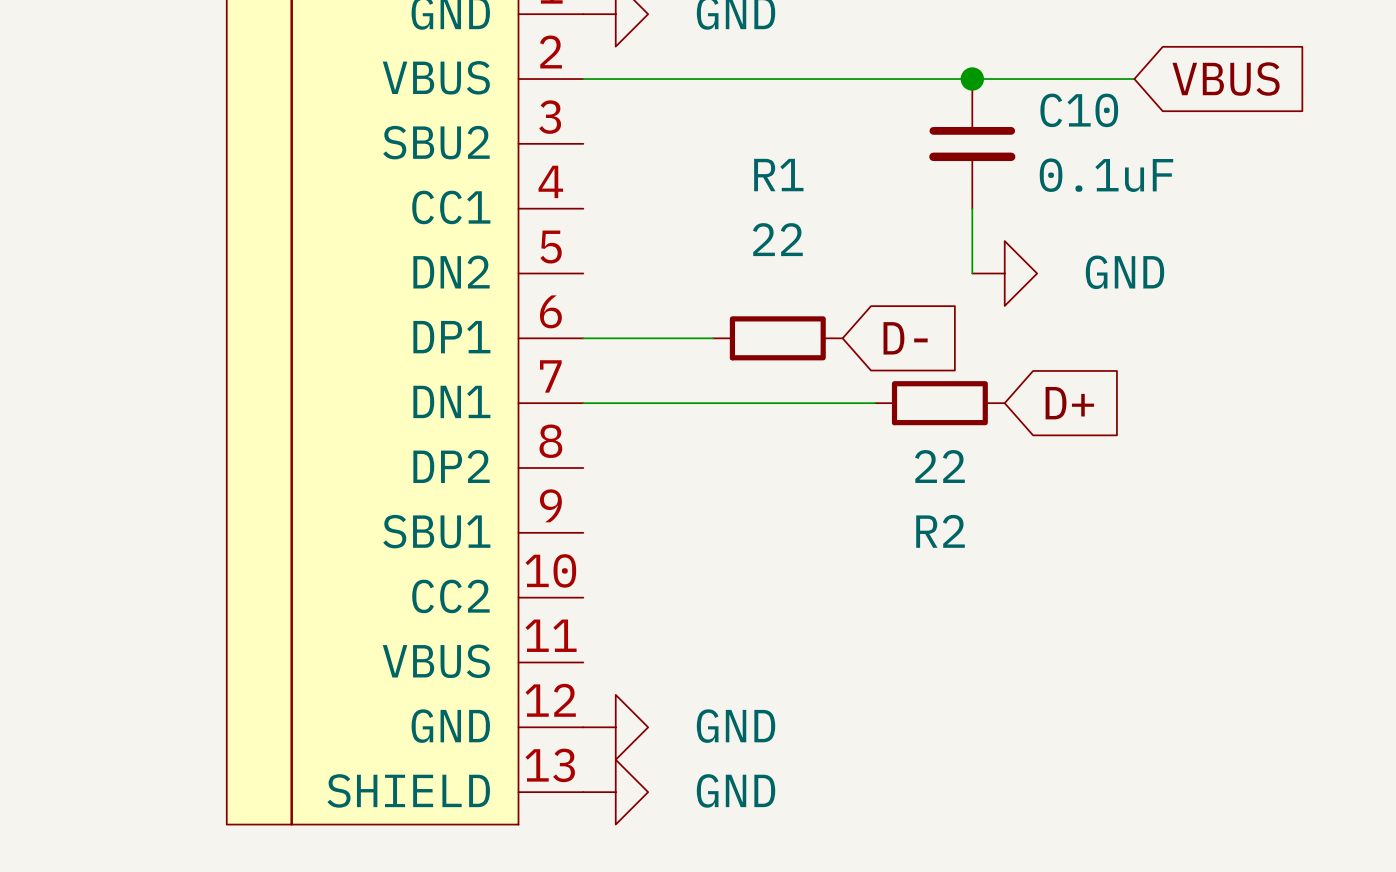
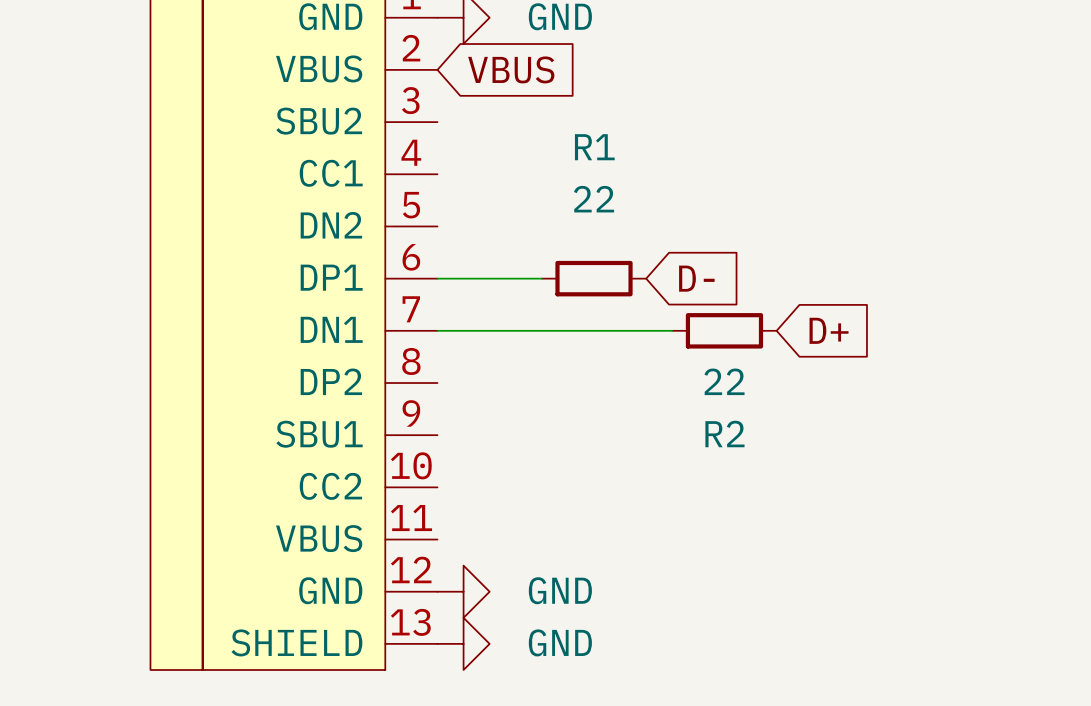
wire: (583, 79) (1134, 79) -> none
junction: (972, 79) -> none
global label position: VBUS (1226, 79) -> VBUS (511, 69)
C10: 0.1uF (972, 143) -> none
wire: (972, 208) (972, 273) -> none
power symbol: GND (1004, 273) -> none

